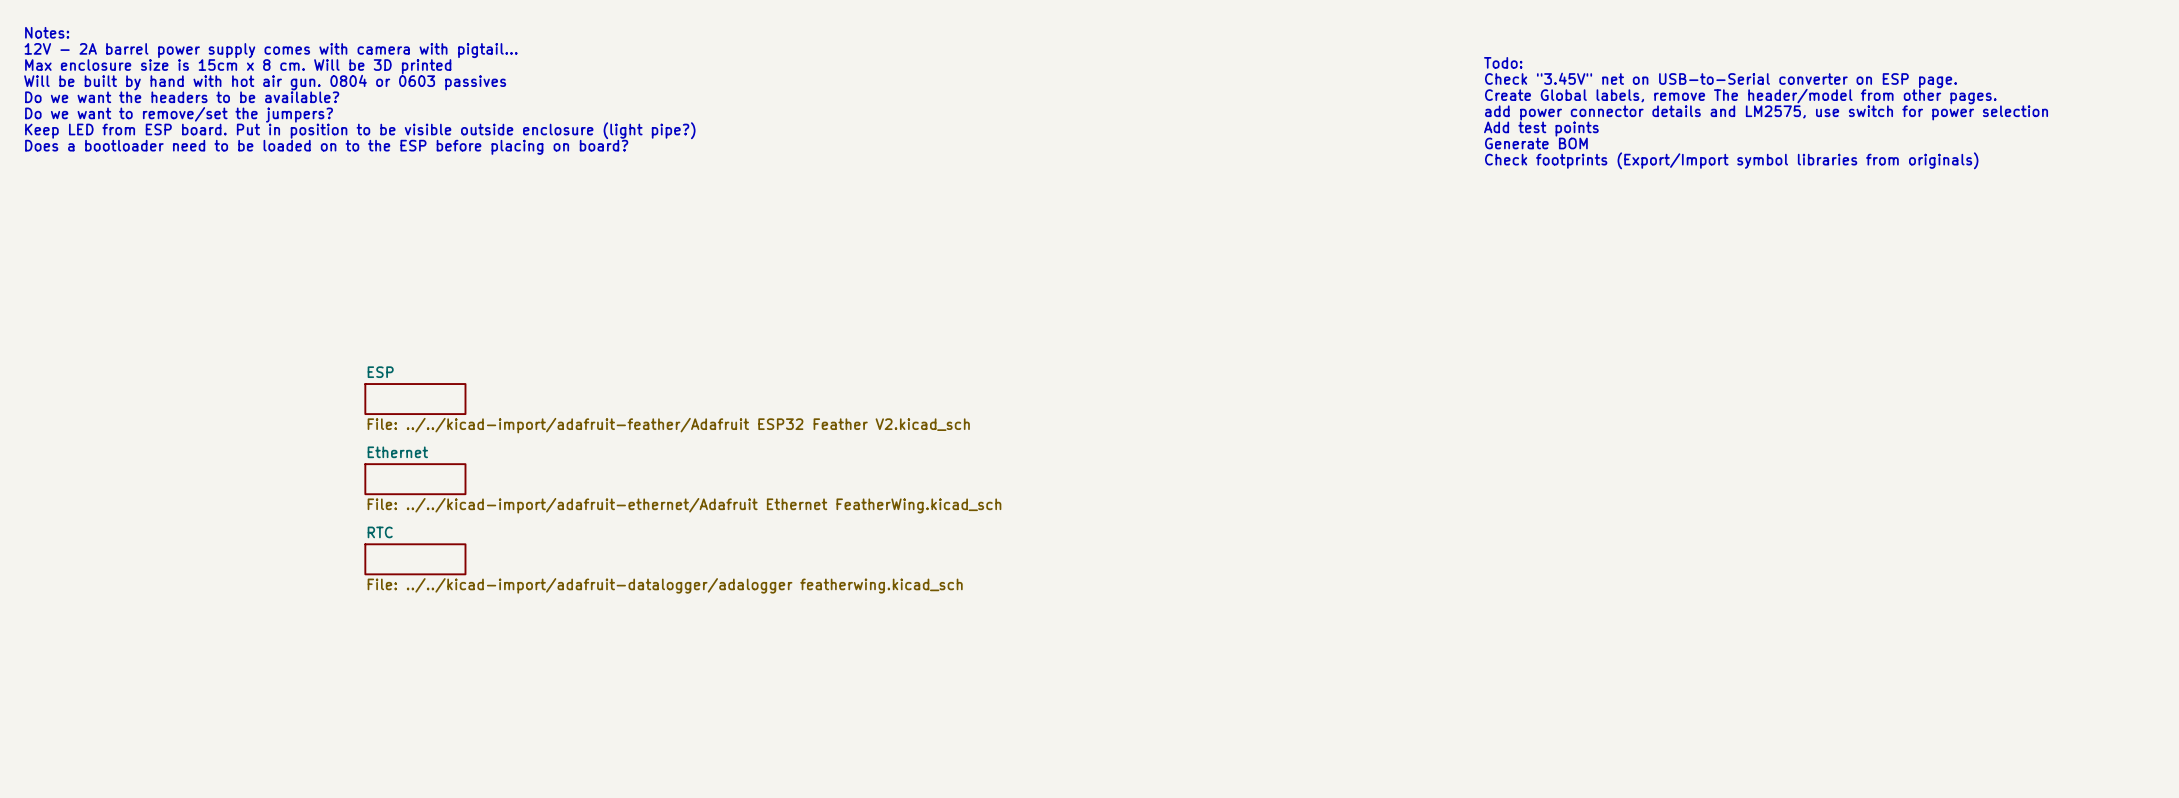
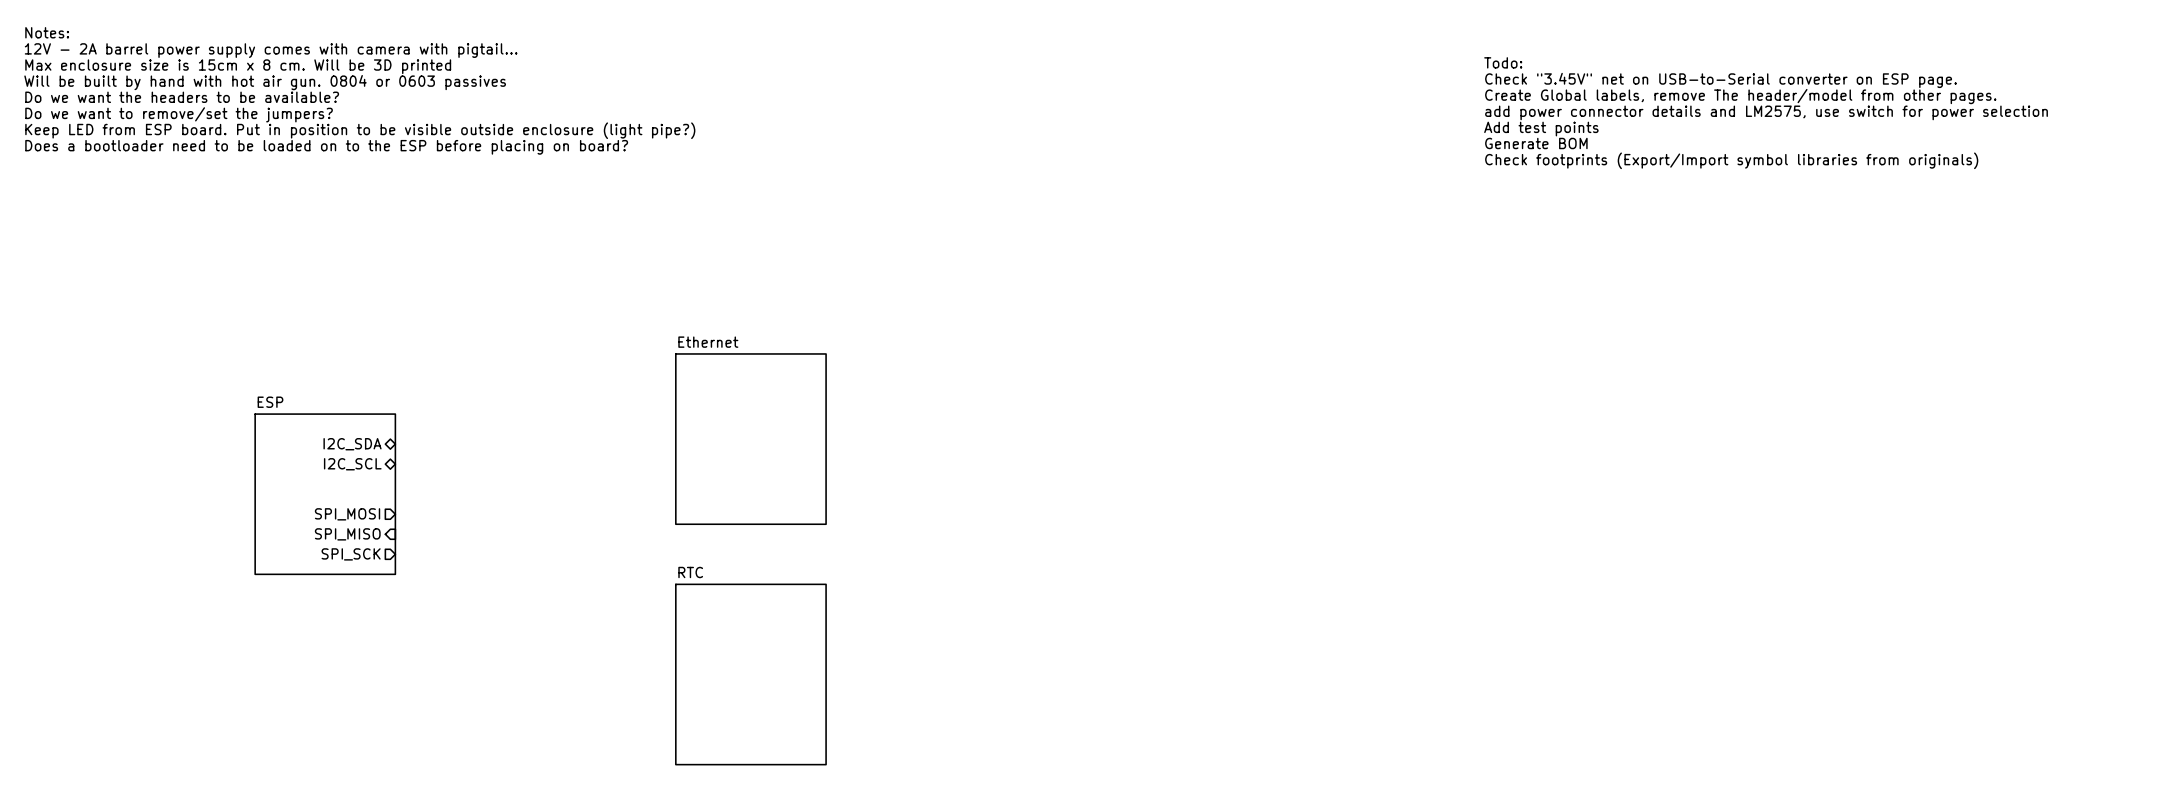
sheet ESP: File: ../../kicad-import/adafruit-feather/Adafruit ESP32 Feather V2.kicad_sch (415, 399) -> none
sheet Ethernet: none -> (750, 439)
sheet pin: none -> I2C_SDA (352, 444)
sheet pin: none -> I2C_SCL (352, 464)
sheet Ethernet: File: ../../kicad-import/adafruit-ethernet/Adafruit Ethernet FeatherWing.kicad_sch (415, 479) -> none
sheet ESP: none -> (325, 494)
sheet pin: none -> SPI_MOSI (347, 514)
sheet pin: none -> SPI_MISO (347, 534)
sheet pin: none -> SPI_SCK (351, 554)
sheet RTC: File: ../../kicad-import/adafruit-datalogger/adalogger featherwing.kicad_sch (415, 559) -> none
sheet RTC: none -> (750, 674)

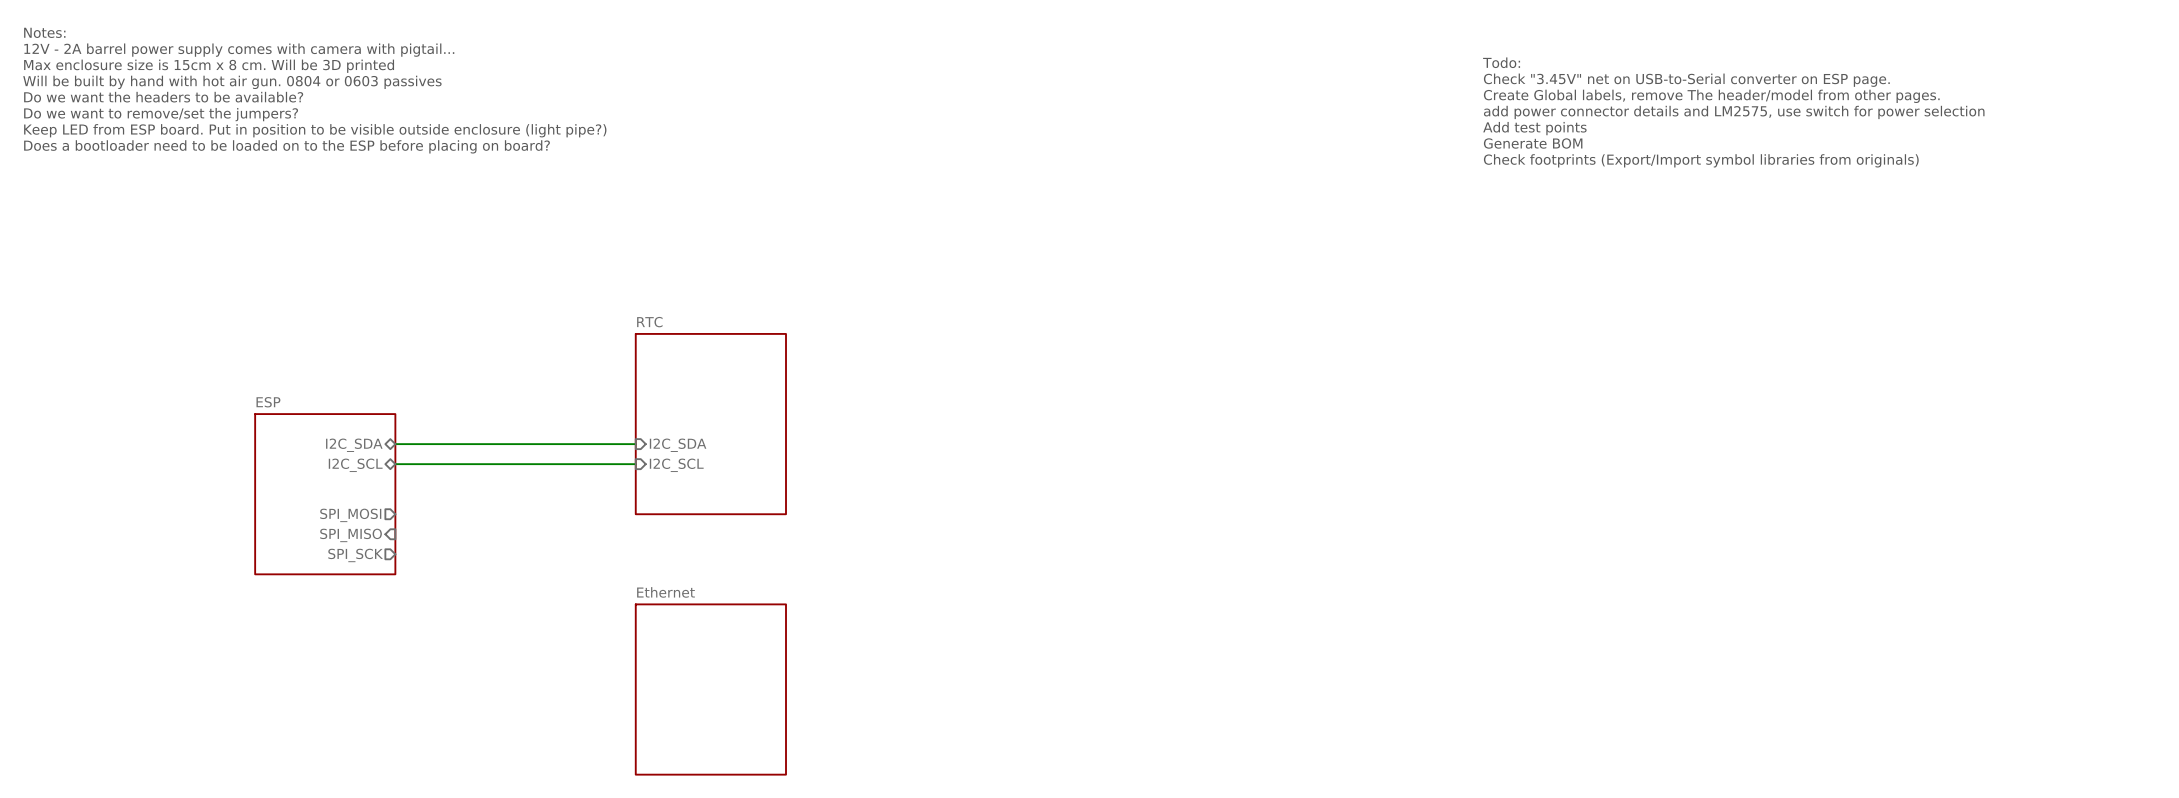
sheet RTC: none -> (710, 424)
sheet Ethernet: (750, 439) -> none
wire: none -> (395, 444) (635, 444)
sheet pin: none -> I2C_SDA (678, 445)
wire: none -> (395, 464) (635, 464)
sheet pin: none -> I2C_SCL (676, 465)
sheet RTC: (750, 674) -> none
sheet Ethernet: none -> (710, 689)

